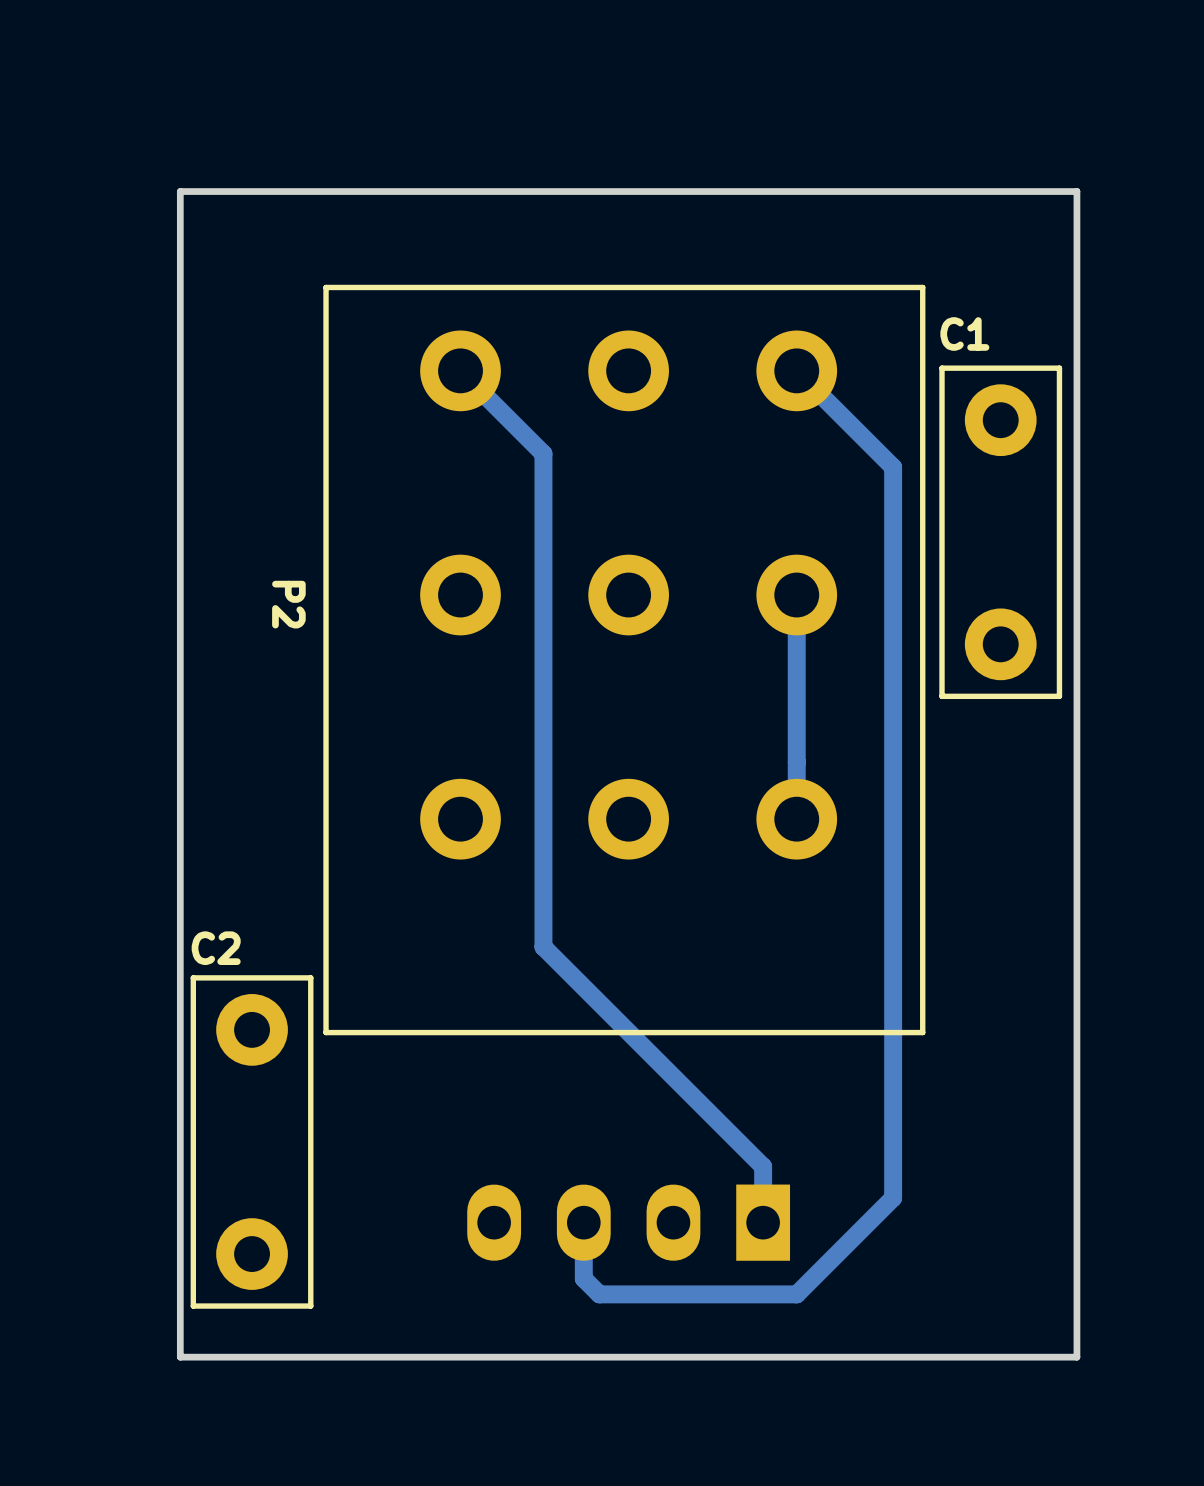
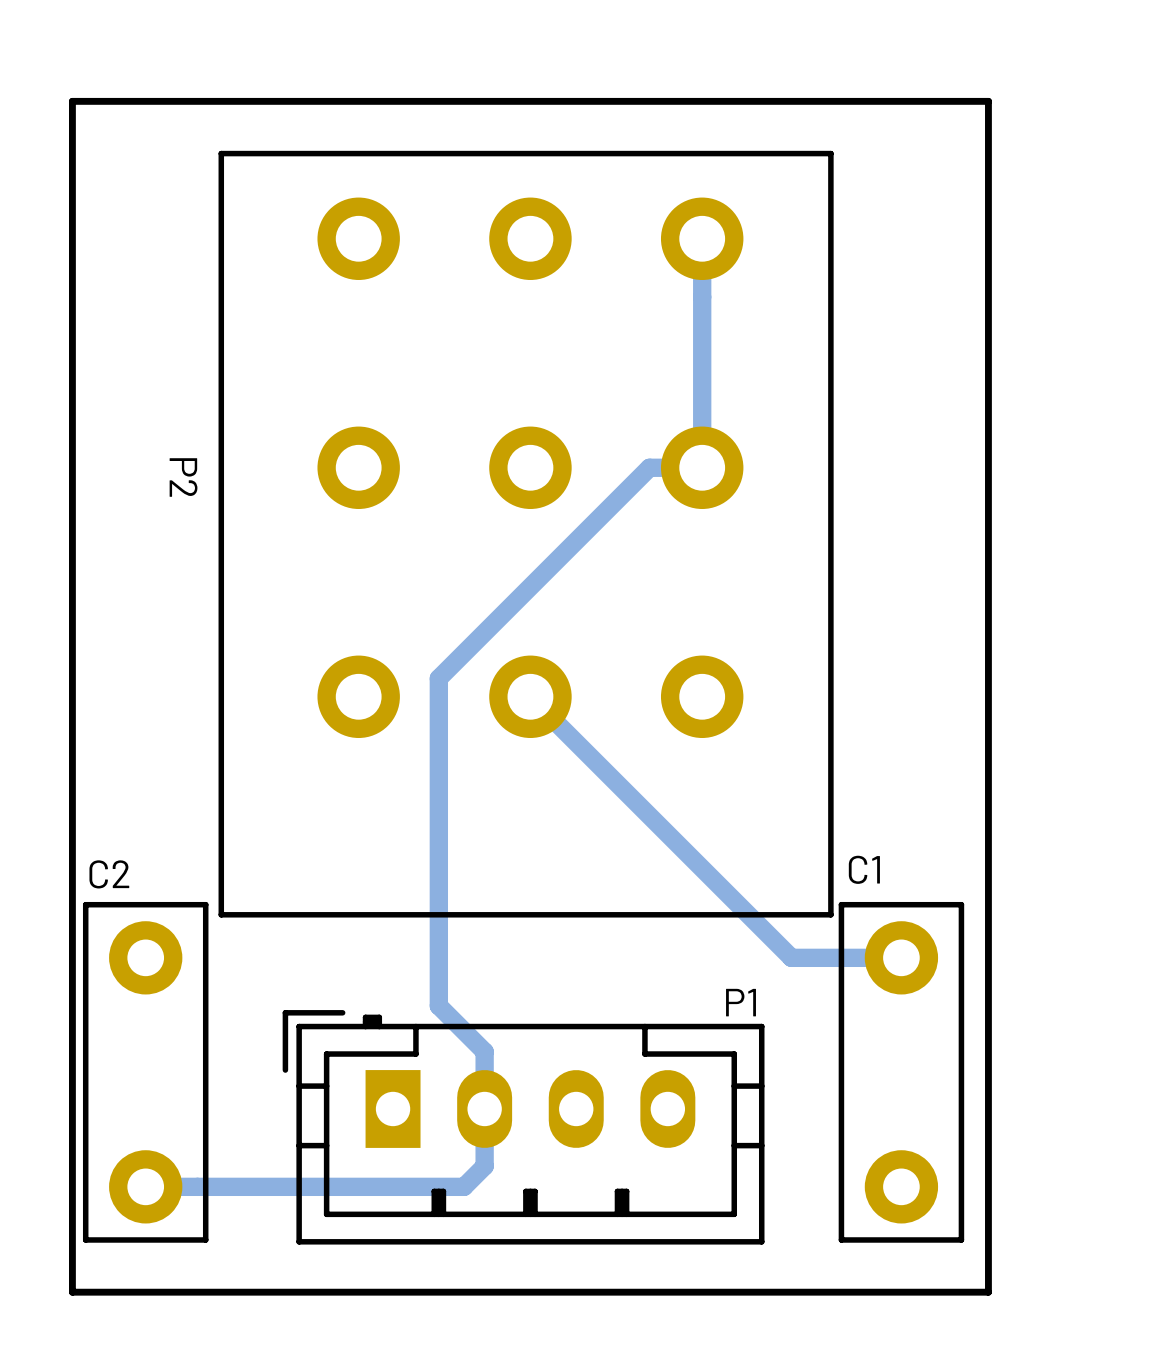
track: none -> (702, 238) (702, 467) (649, 467) (438, 678) (438, 1005) (484, 1051) (484, 1154)
track: (460, 370) (543, 453) (543, 946) (763, 1166) (763, 1222) -> none
track: (796, 370) (893, 467) (893, 1198) (796, 1294) (599, 1294) (583, 1278) (583, 1233) -> (145, 1186) (464, 1186) (484, 1166)
C1 position: (1000, 532) -> (901, 1072)
track: (796, 595) (796, 819) -> none
P2 position: (624, 660) -> (526, 534)
track: none -> (530, 696) (791, 957) (901, 957)
P1 side: top (628, 1222) -> bottom (523, 1127)

